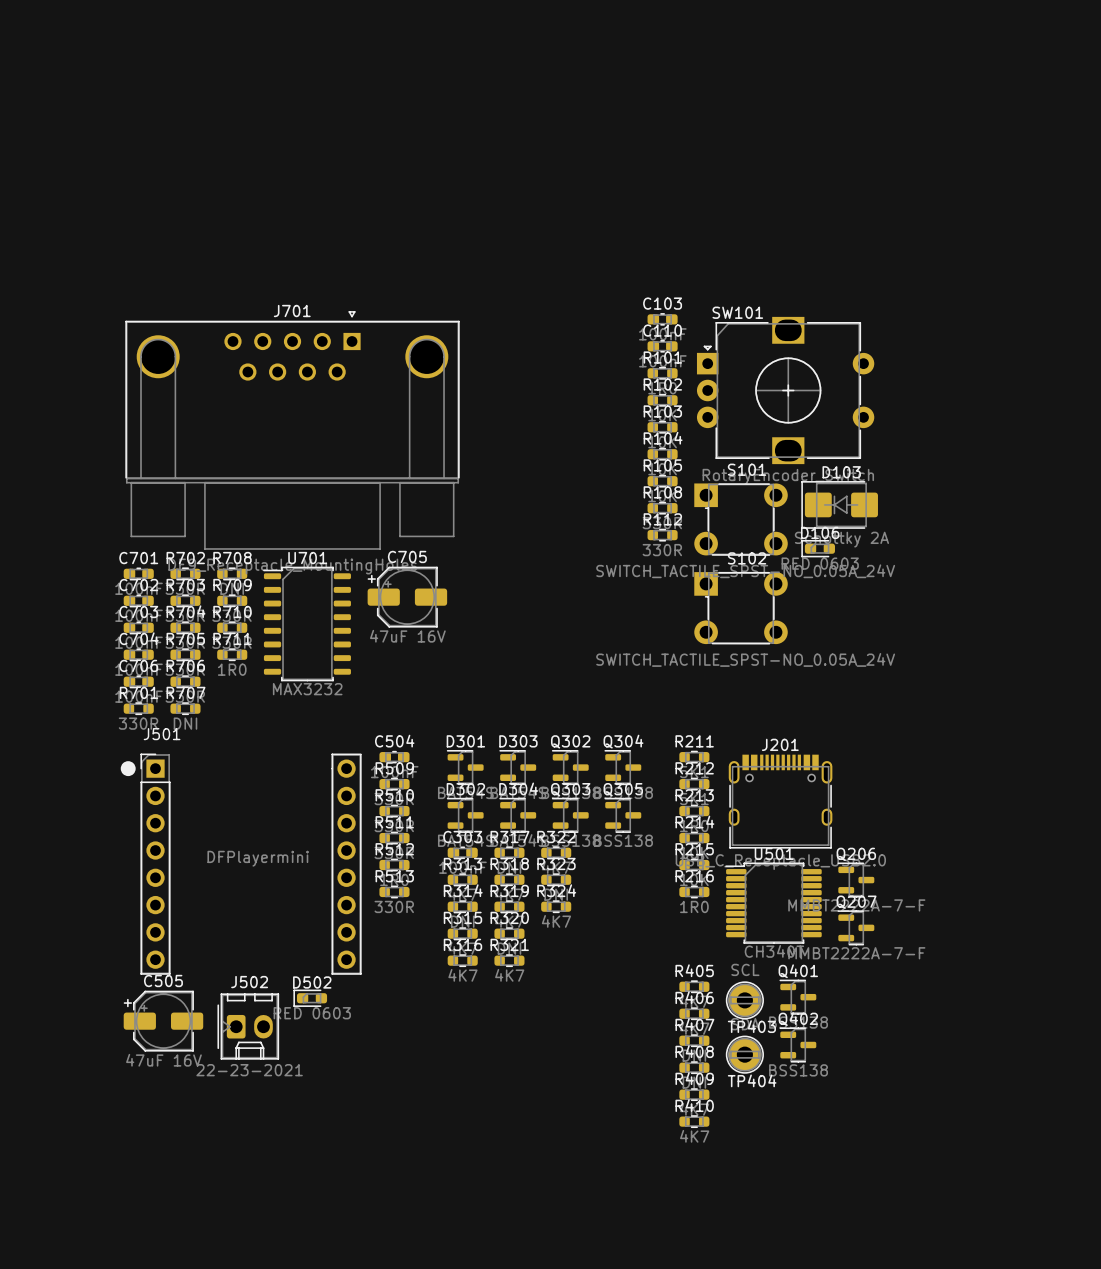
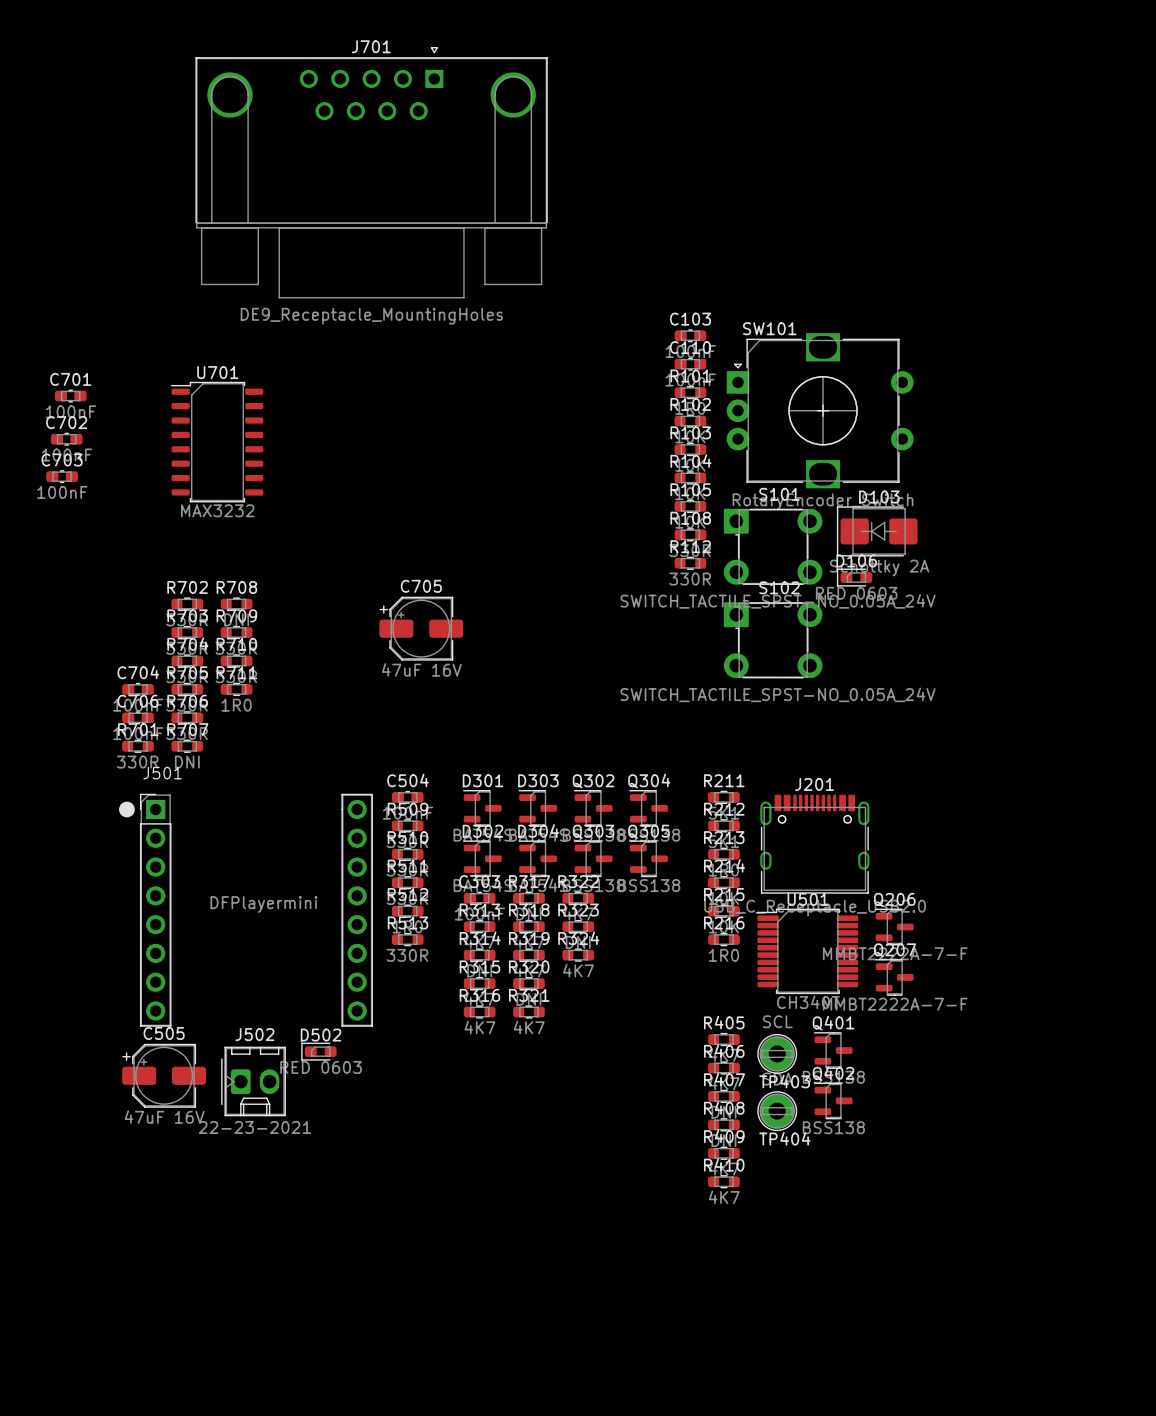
J701 position: (292, 430) -> (371, 172)
C701 position: (138, 573) -> (70, 396)
C702 position: (138, 600) -> (66, 439)
U701 position: (307, 624) -> (217, 442)
C703 position: (138, 627) -> (62, 476)

